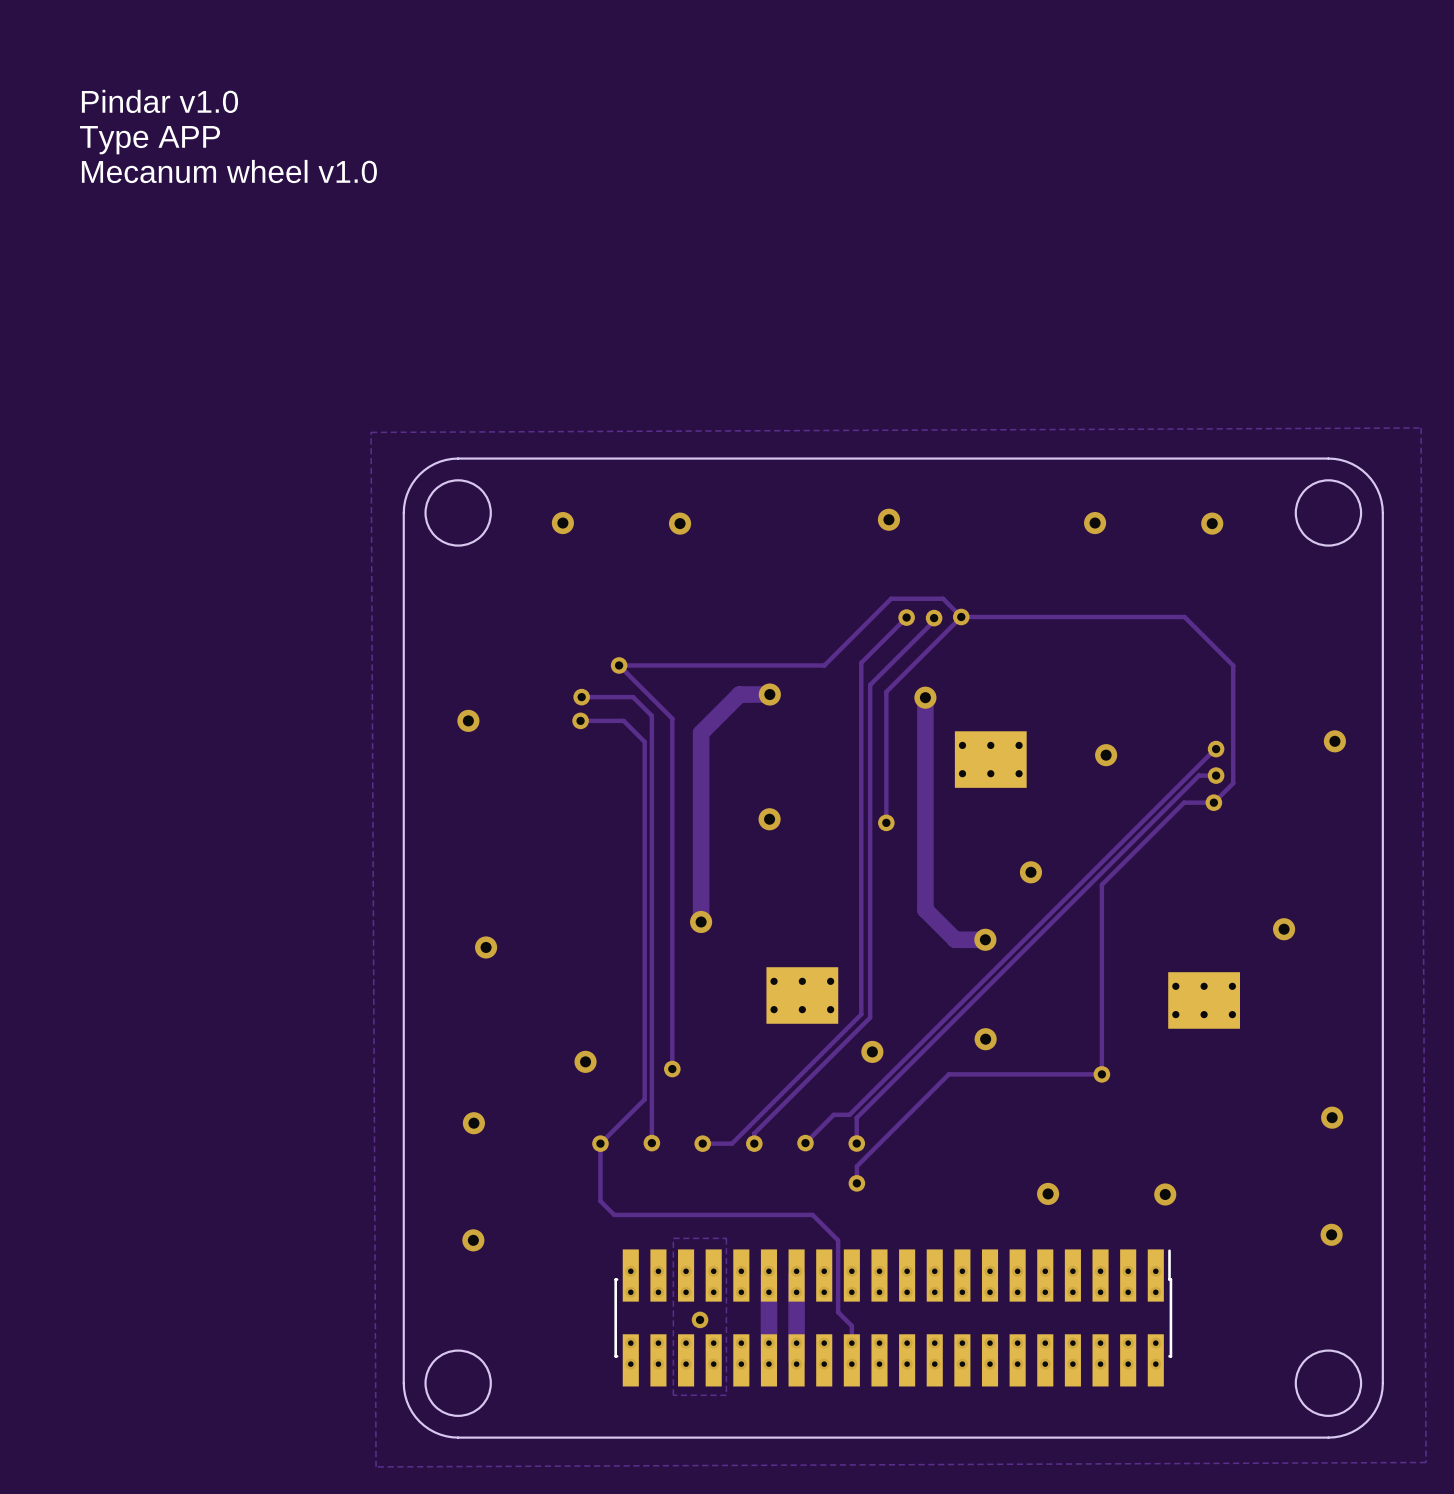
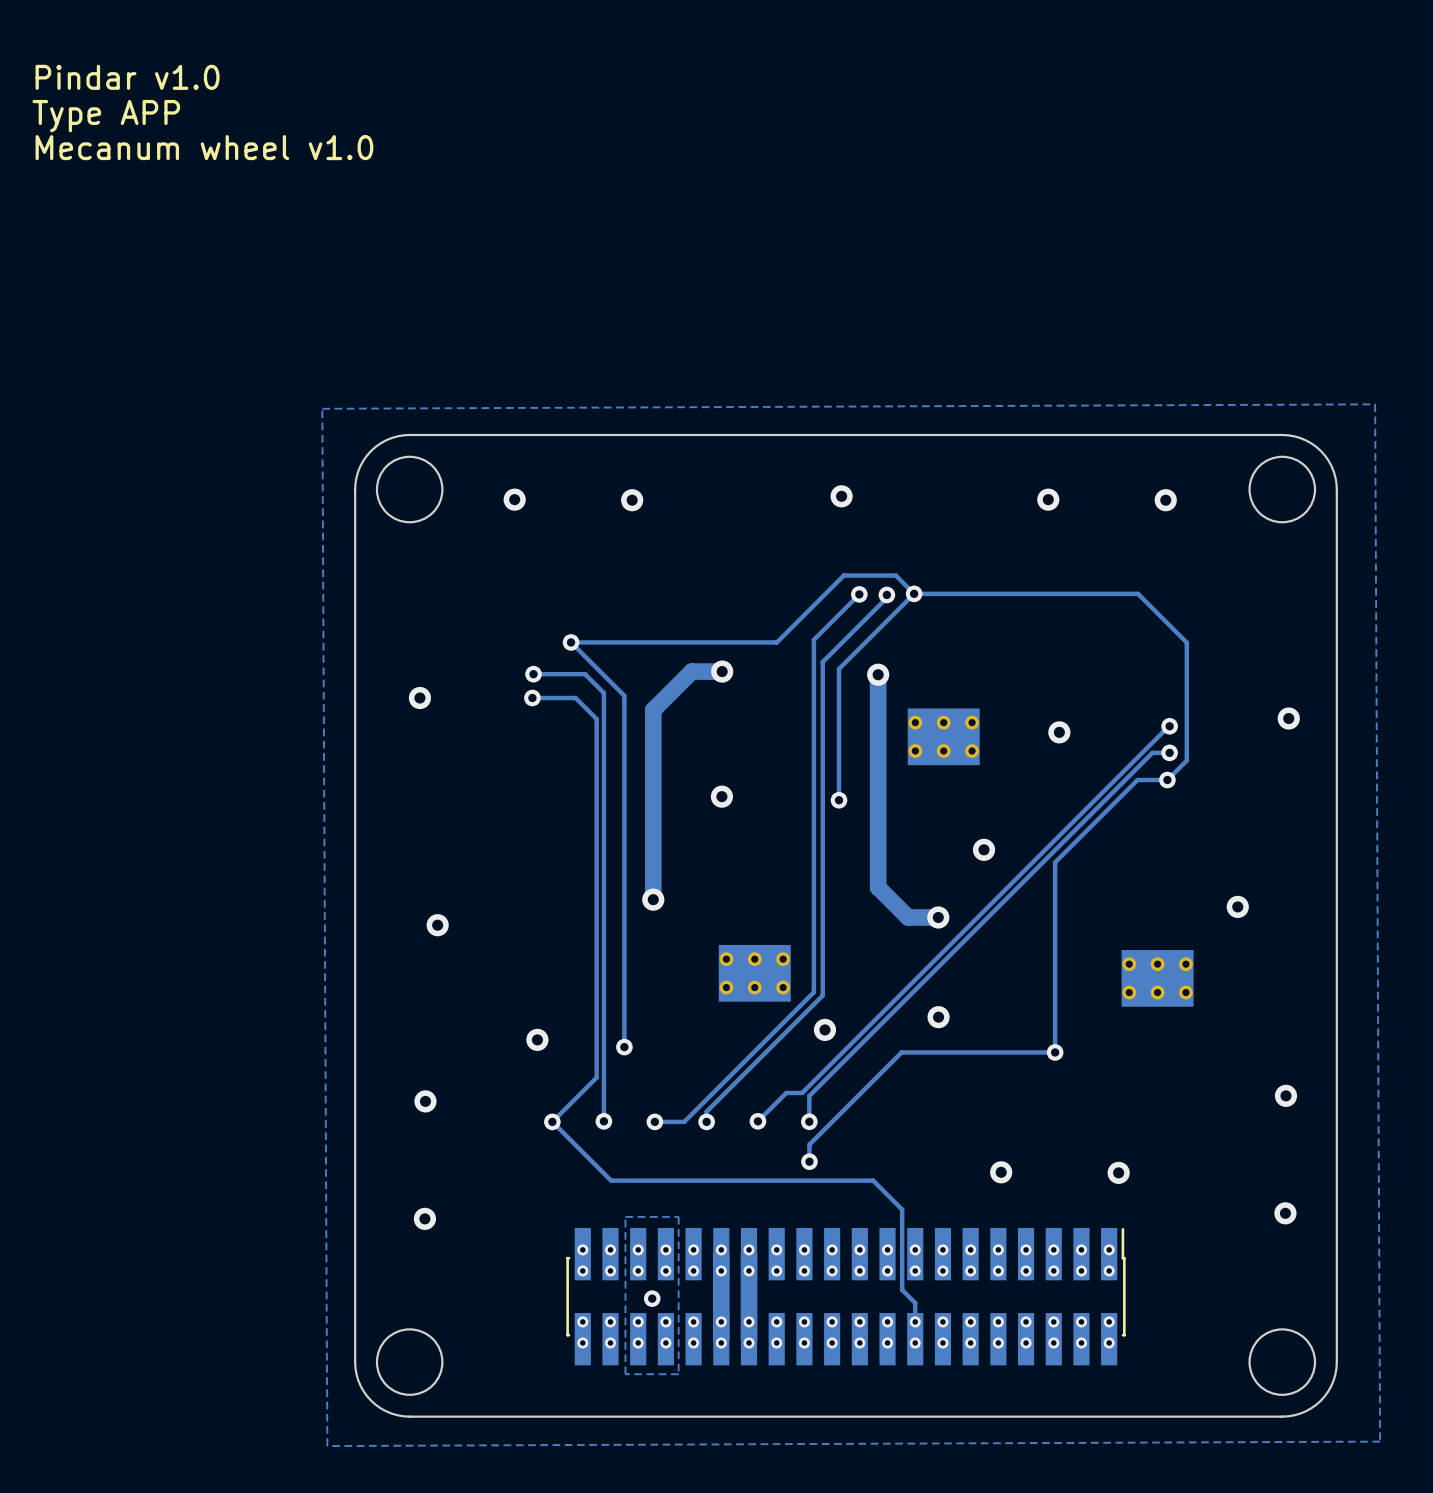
track: (600, 1143) (600, 1201) (614, 1214) (812, 1214) (838, 1240) (838, 1312) (851, 1325) (851, 1360) -> (552, 1121) (611, 1180) (873, 1180) (902, 1209) (902, 1289) (915, 1303) (915, 1321)

